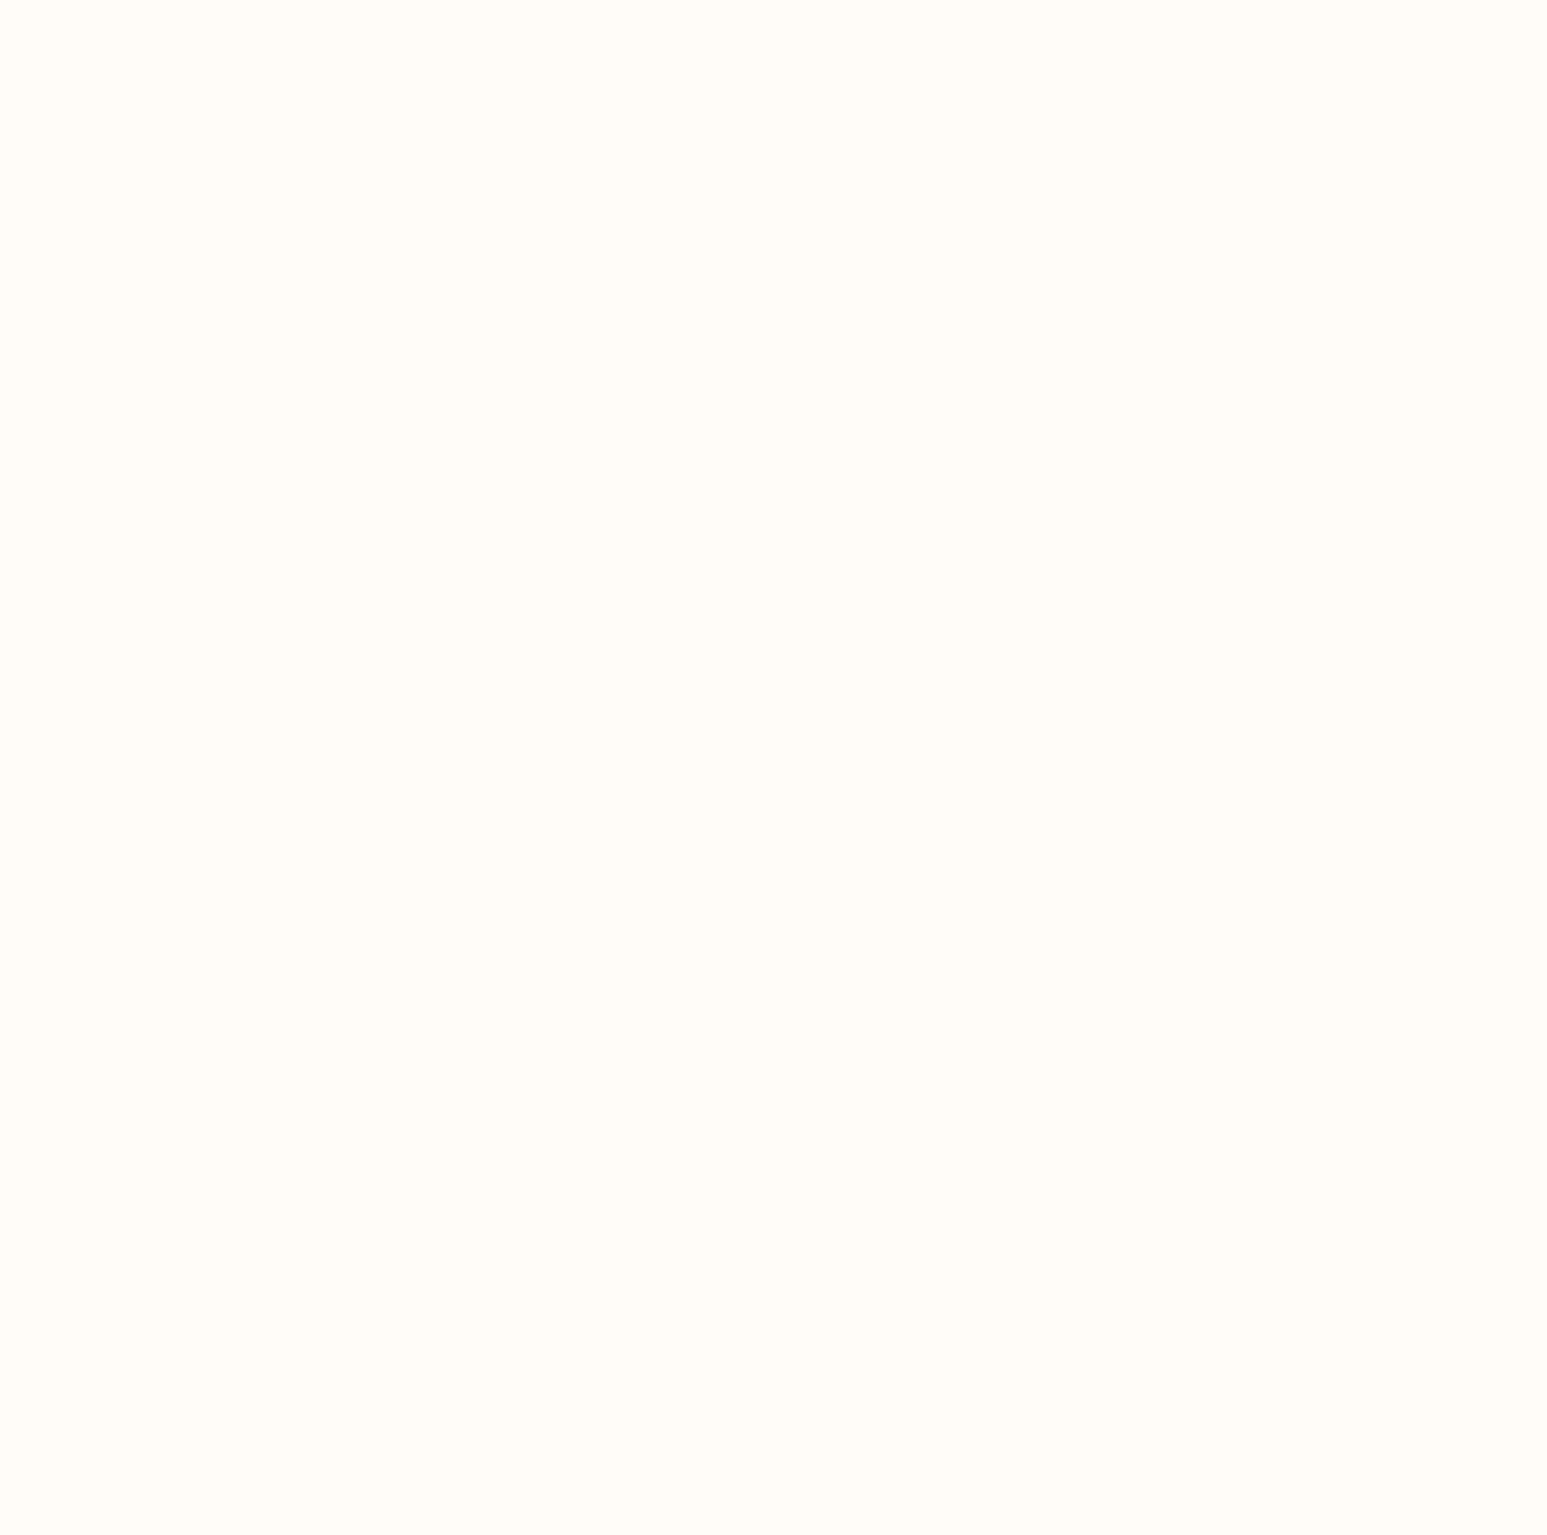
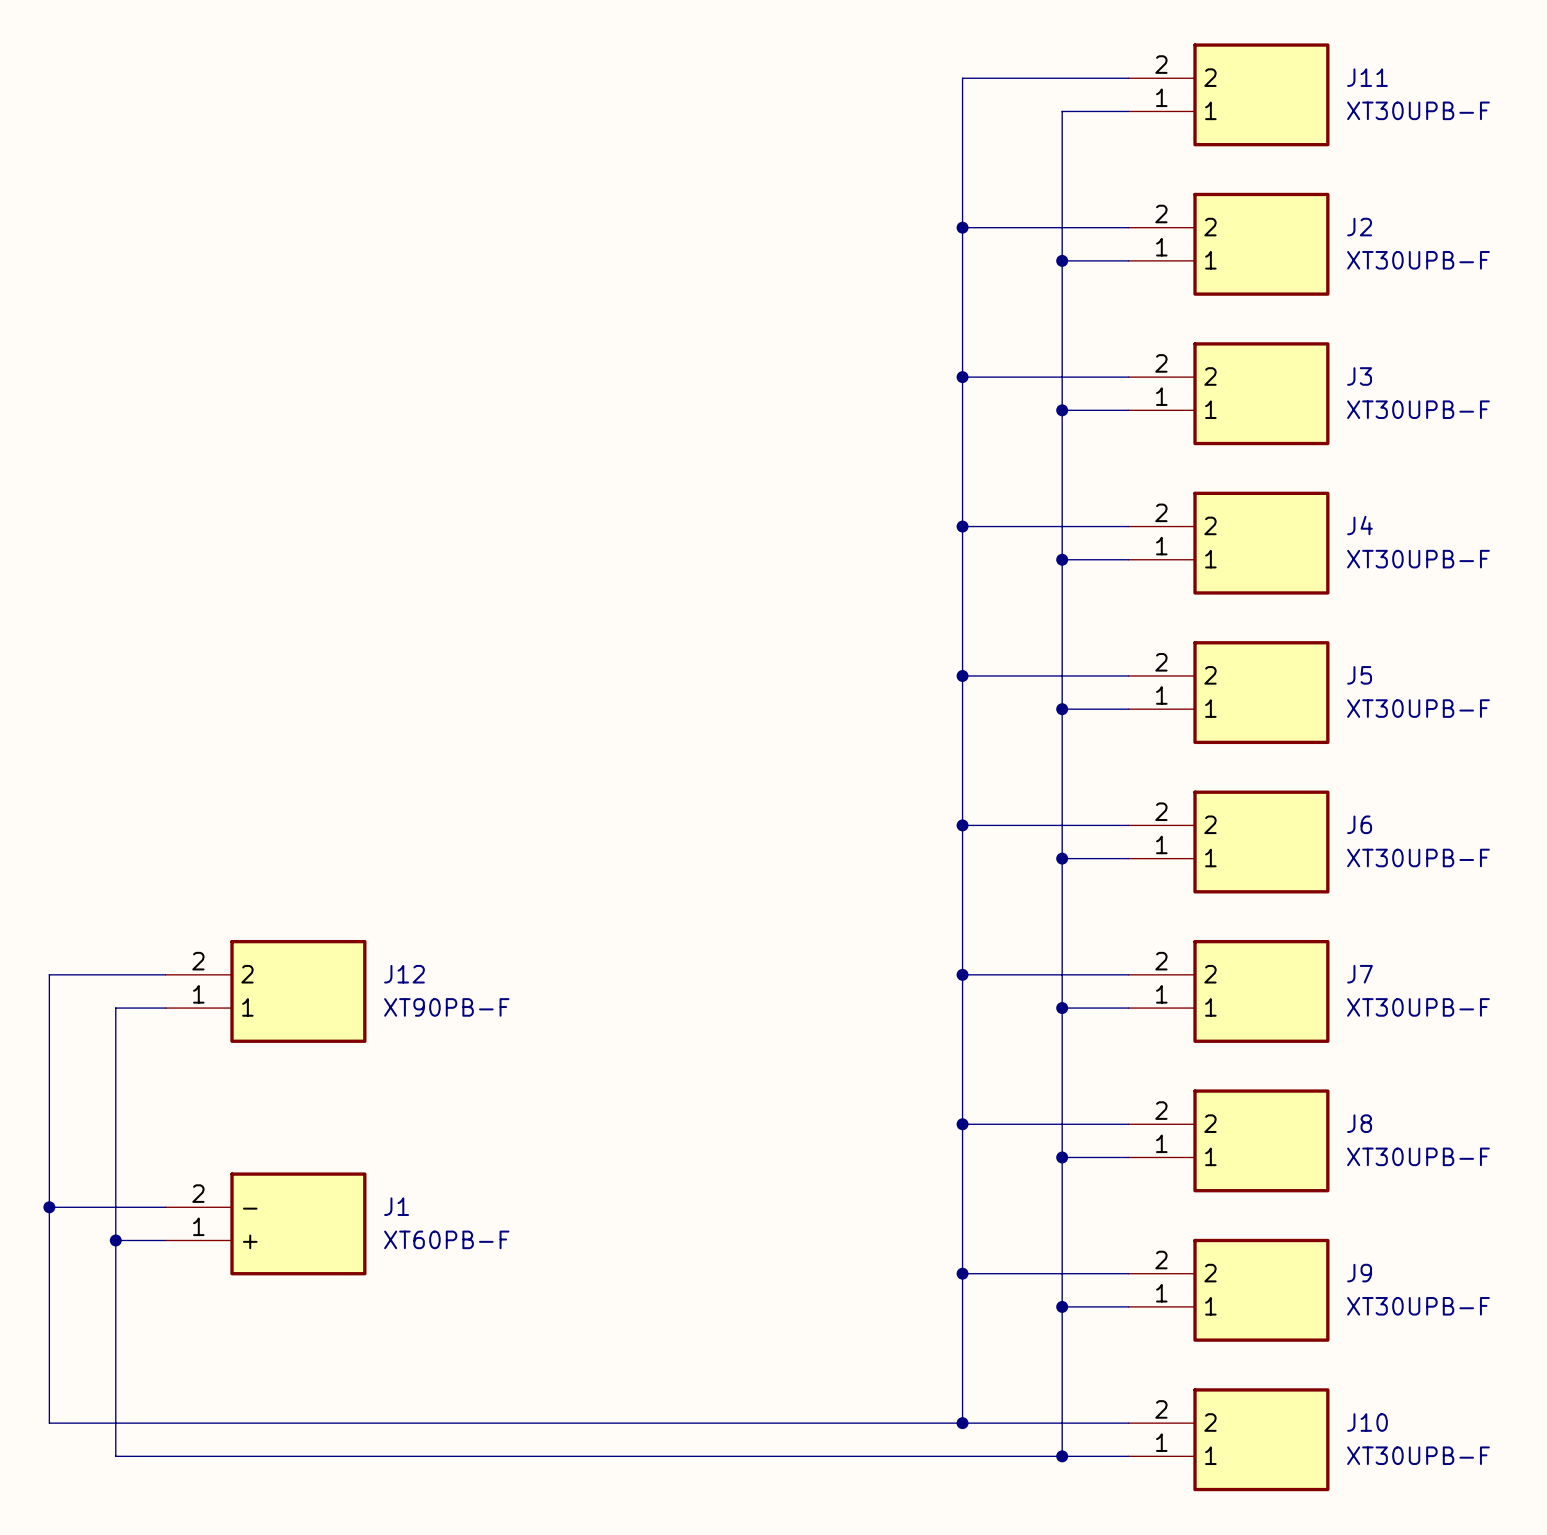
wire: none -> (1128, 78) (962, 78) (962, 1423)
J11: none -> XT30UPB-F (1229, 94)
wire: none -> (1128, 111) (1062, 111) (1062, 1456)
wire: none -> (962, 227) (1128, 227)
junction: none -> (962, 227)
J2: none -> XT30UPB-F (1229, 244)
wire: none -> (1062, 260) (1128, 260)
junction: none -> (1062, 260)
wire: none -> (962, 377) (1128, 377)
junction: none -> (962, 377)
J3: none -> XT30UPB-F (1229, 393)
wire: none -> (1062, 410) (1128, 410)
junction: none -> (1062, 410)
wire: none -> (962, 526) (1128, 526)
junction: none -> (962, 526)
J4: none -> XT30UPB-F (1229, 543)
wire: none -> (1062, 559) (1128, 559)
junction: none -> (1062, 559)
wire: none -> (962, 675) (1128, 675)
junction: none -> (962, 675)
J5: none -> XT30UPB-F (1229, 692)
wire: none -> (1062, 709) (1128, 709)
junction: none -> (1062, 709)
wire: none -> (962, 825) (1128, 825)
junction: none -> (962, 825)
J6: none -> XT30UPB-F (1229, 842)
wire: none -> (1062, 858) (1128, 858)
junction: none -> (1062, 858)
wire: none -> (165, 974) (49, 974) (49, 1423) (1128, 1423)
wire: none -> (962, 974) (1128, 974)
junction: none -> (962, 974)
J12: none -> XT90PB-F (266, 991)
J7: none -> XT30UPB-F (1229, 991)
wire: none -> (165, 1008) (115, 1008) (115, 1456) (1128, 1456)
wire: none -> (1062, 1008) (1128, 1008)
junction: none -> (1062, 1008)
wire: none -> (962, 1124) (1128, 1124)
junction: none -> (962, 1124)
J8: none -> XT30UPB-F (1229, 1140)
wire: none -> (1062, 1157) (1128, 1157)
junction: none -> (1062, 1157)
wire: none -> (49, 1207) (165, 1207)
junction: none -> (49, 1207)
J1: none -> XT60PB-F (266, 1223)
wire: none -> (115, 1240) (165, 1240)
junction: none -> (115, 1240)
wire: none -> (962, 1273) (1128, 1273)
junction: none -> (962, 1273)
J9: none -> XT30UPB-F (1229, 1290)
wire: none -> (1062, 1306) (1128, 1306)
junction: none -> (1062, 1306)
junction: none -> (962, 1423)
J10: none -> XT30UPB-F (1229, 1439)
junction: none -> (1062, 1456)

